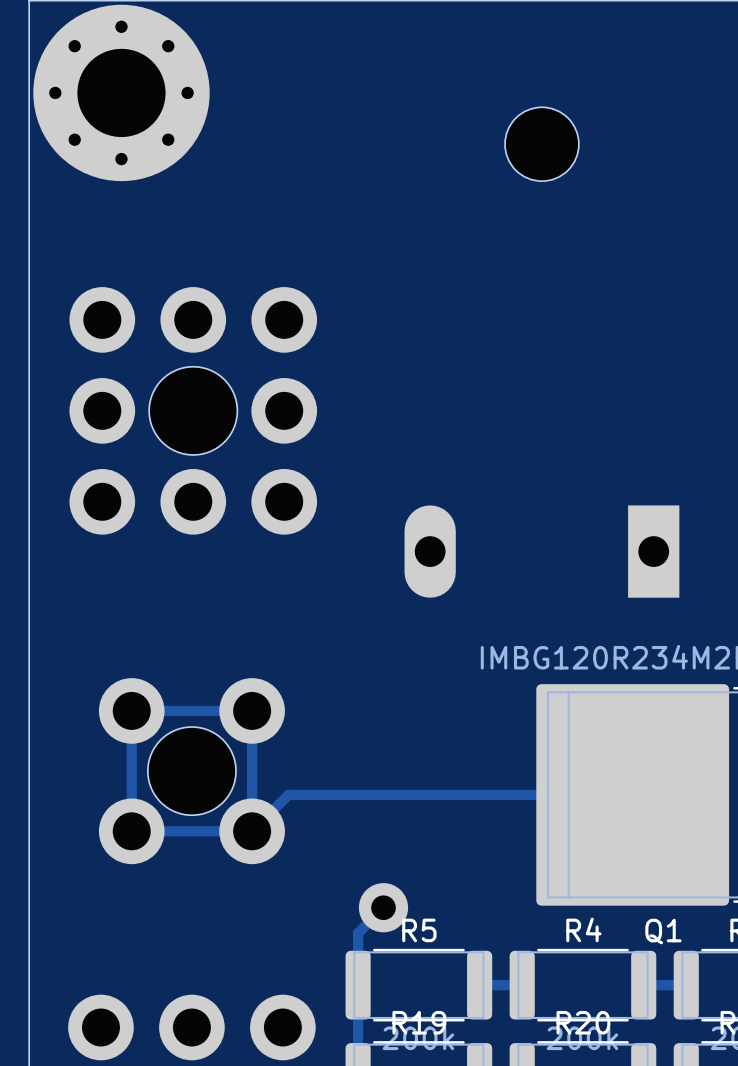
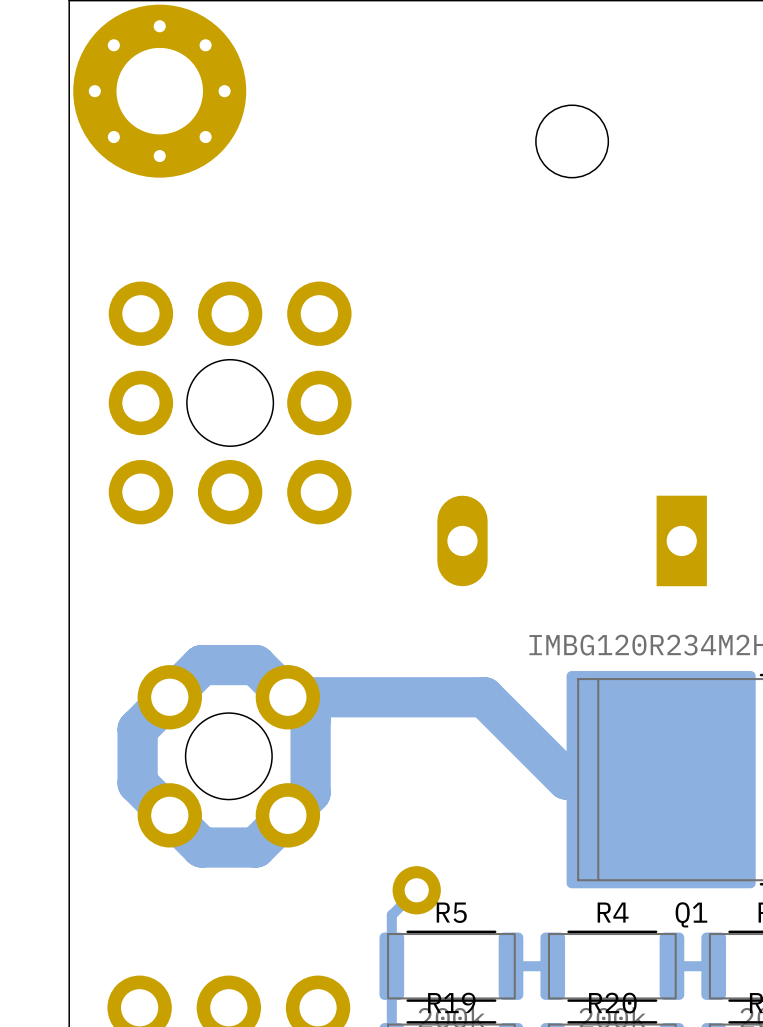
track: (252, 710) (252, 831) (131, 831) (131, 710) (252, 710) -> none
track: (536, 794) (288, 794) (275, 808) -> (566, 779) (484, 697) (287, 697)
track: none -> (310, 792) (310, 720) (255, 665) (201, 665) (137, 729) (137, 783) (201, 847) (255, 847) (287, 815)

